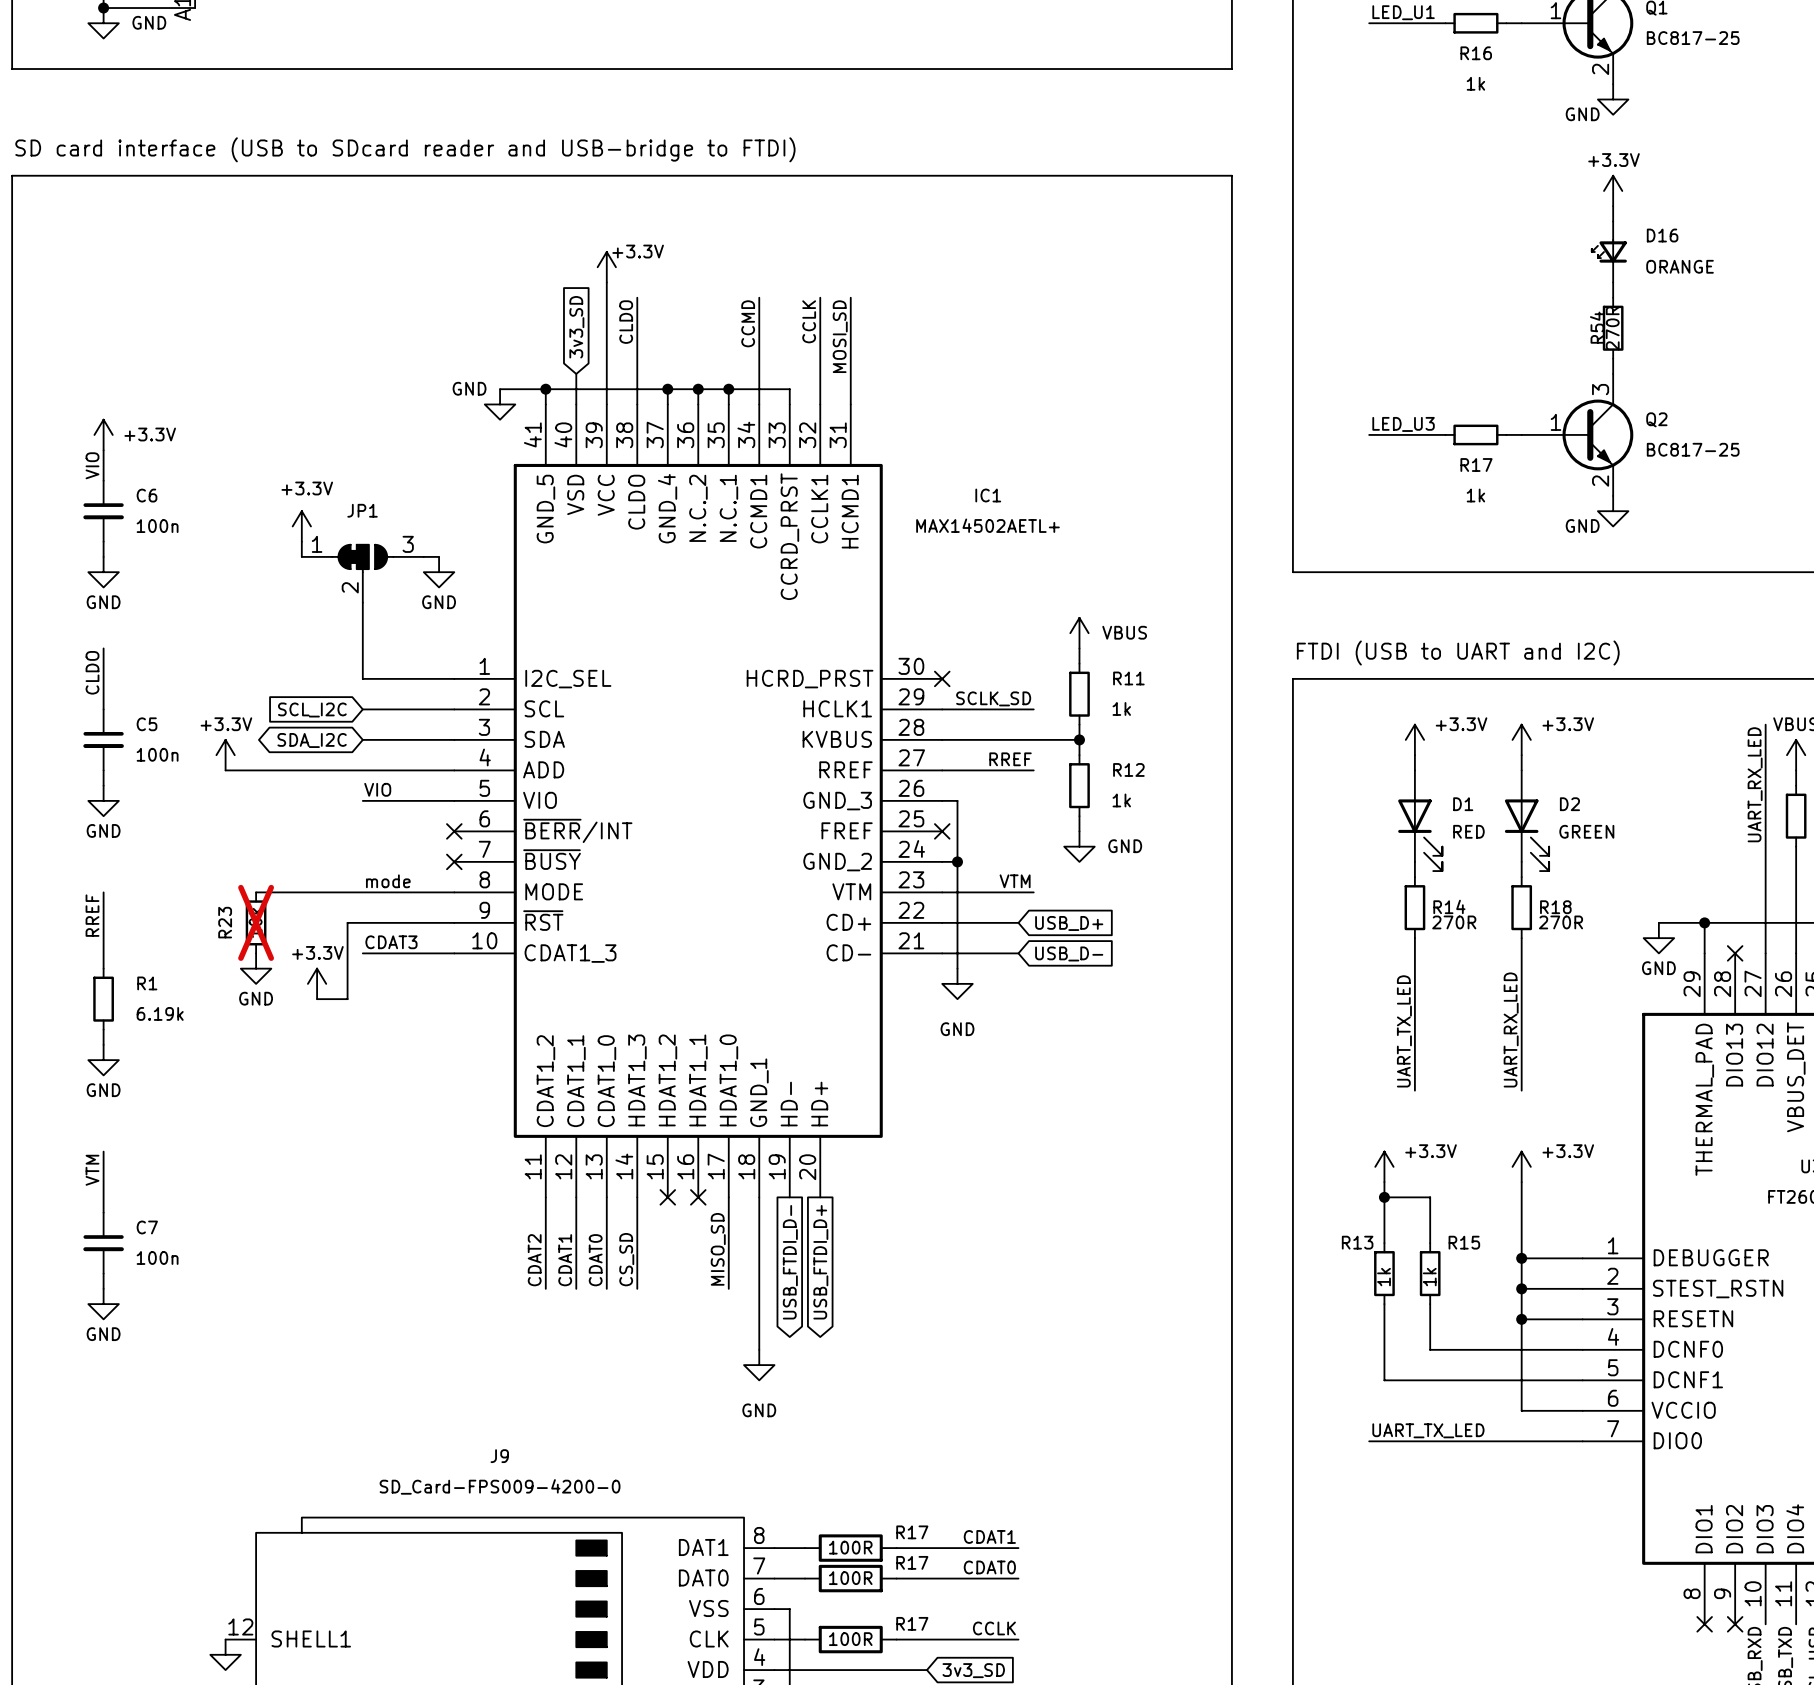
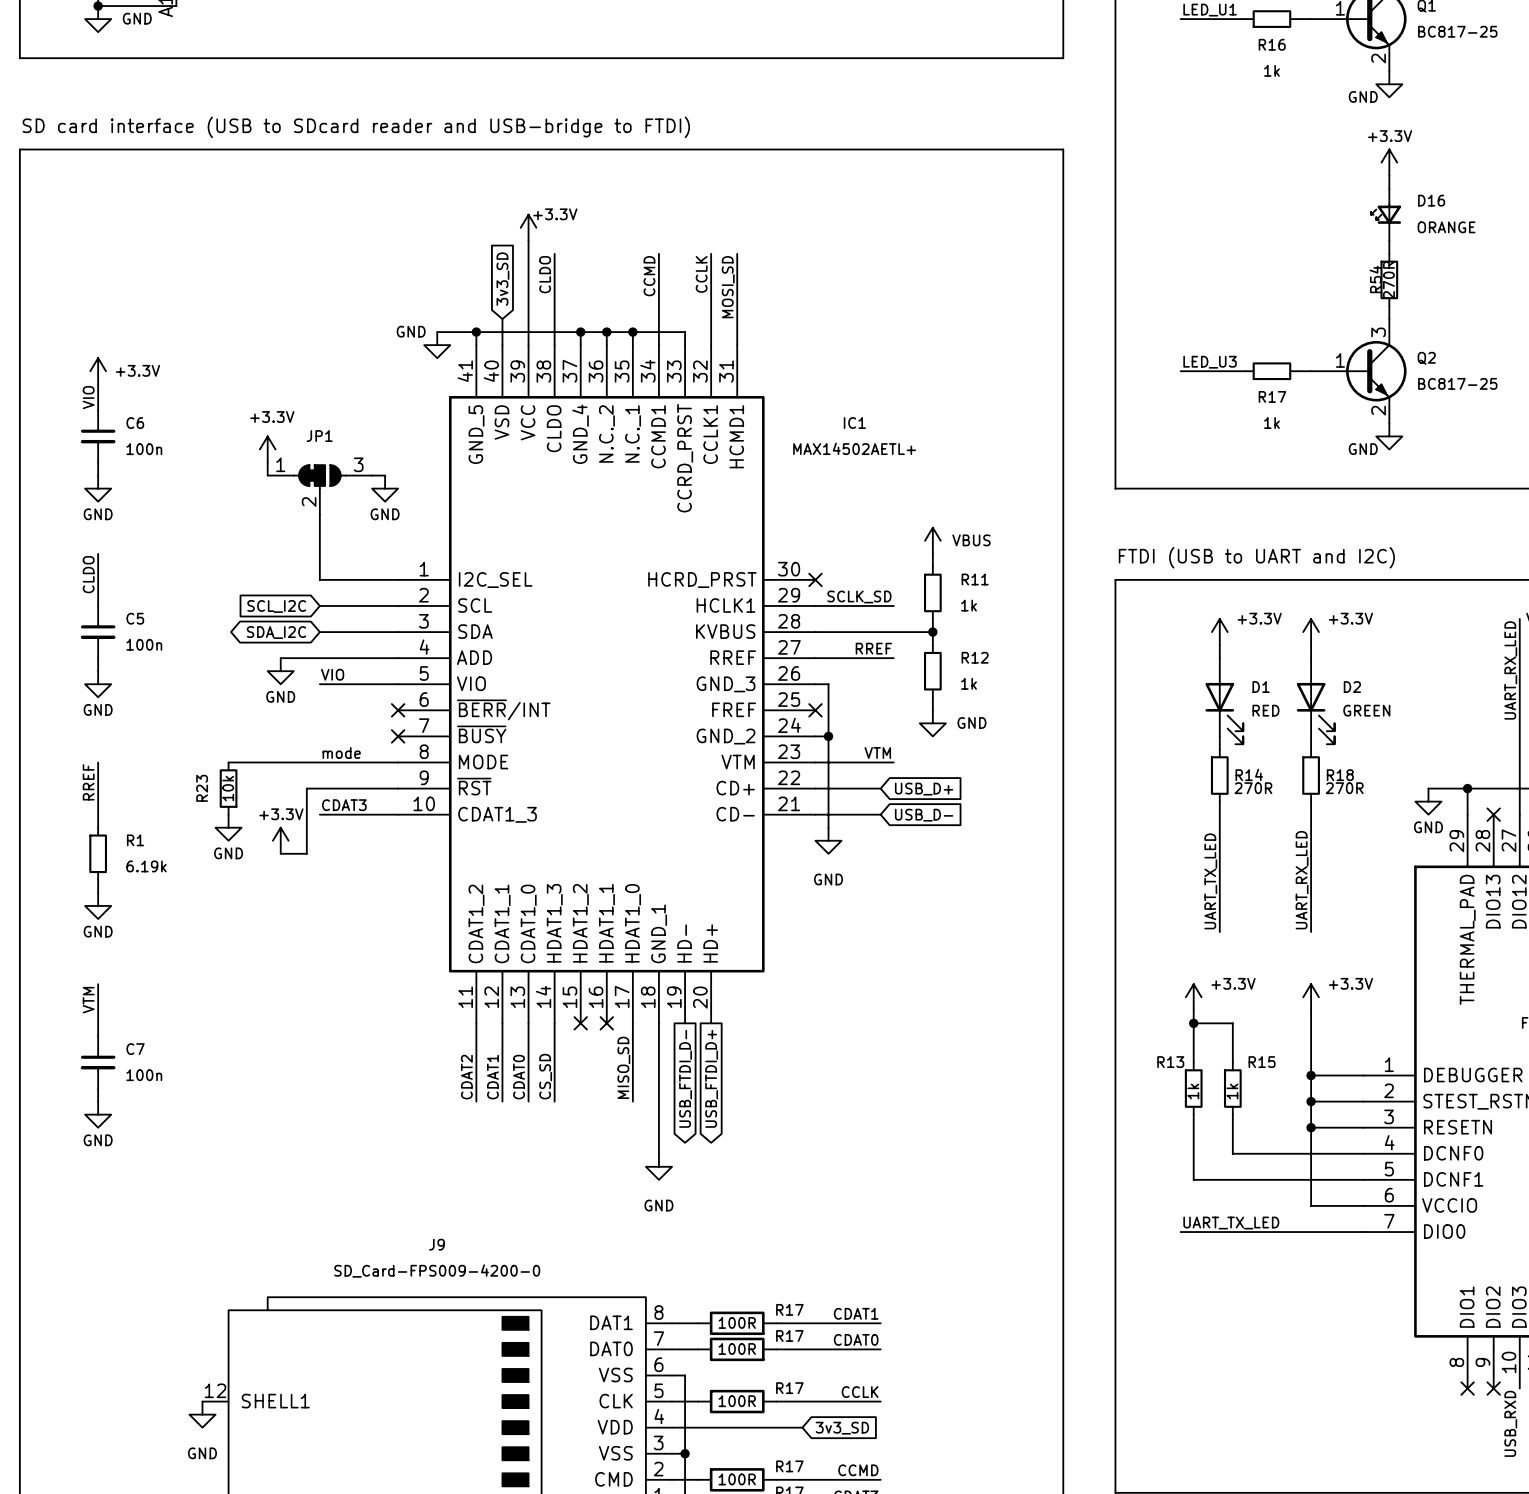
power symbol: +3.3V (225, 755) -> none
wire: (225, 770) (317, 770) -> none
power symbol: none -> GND (280, 671)
R23 do-not-place cross: (256, 922) -> none

